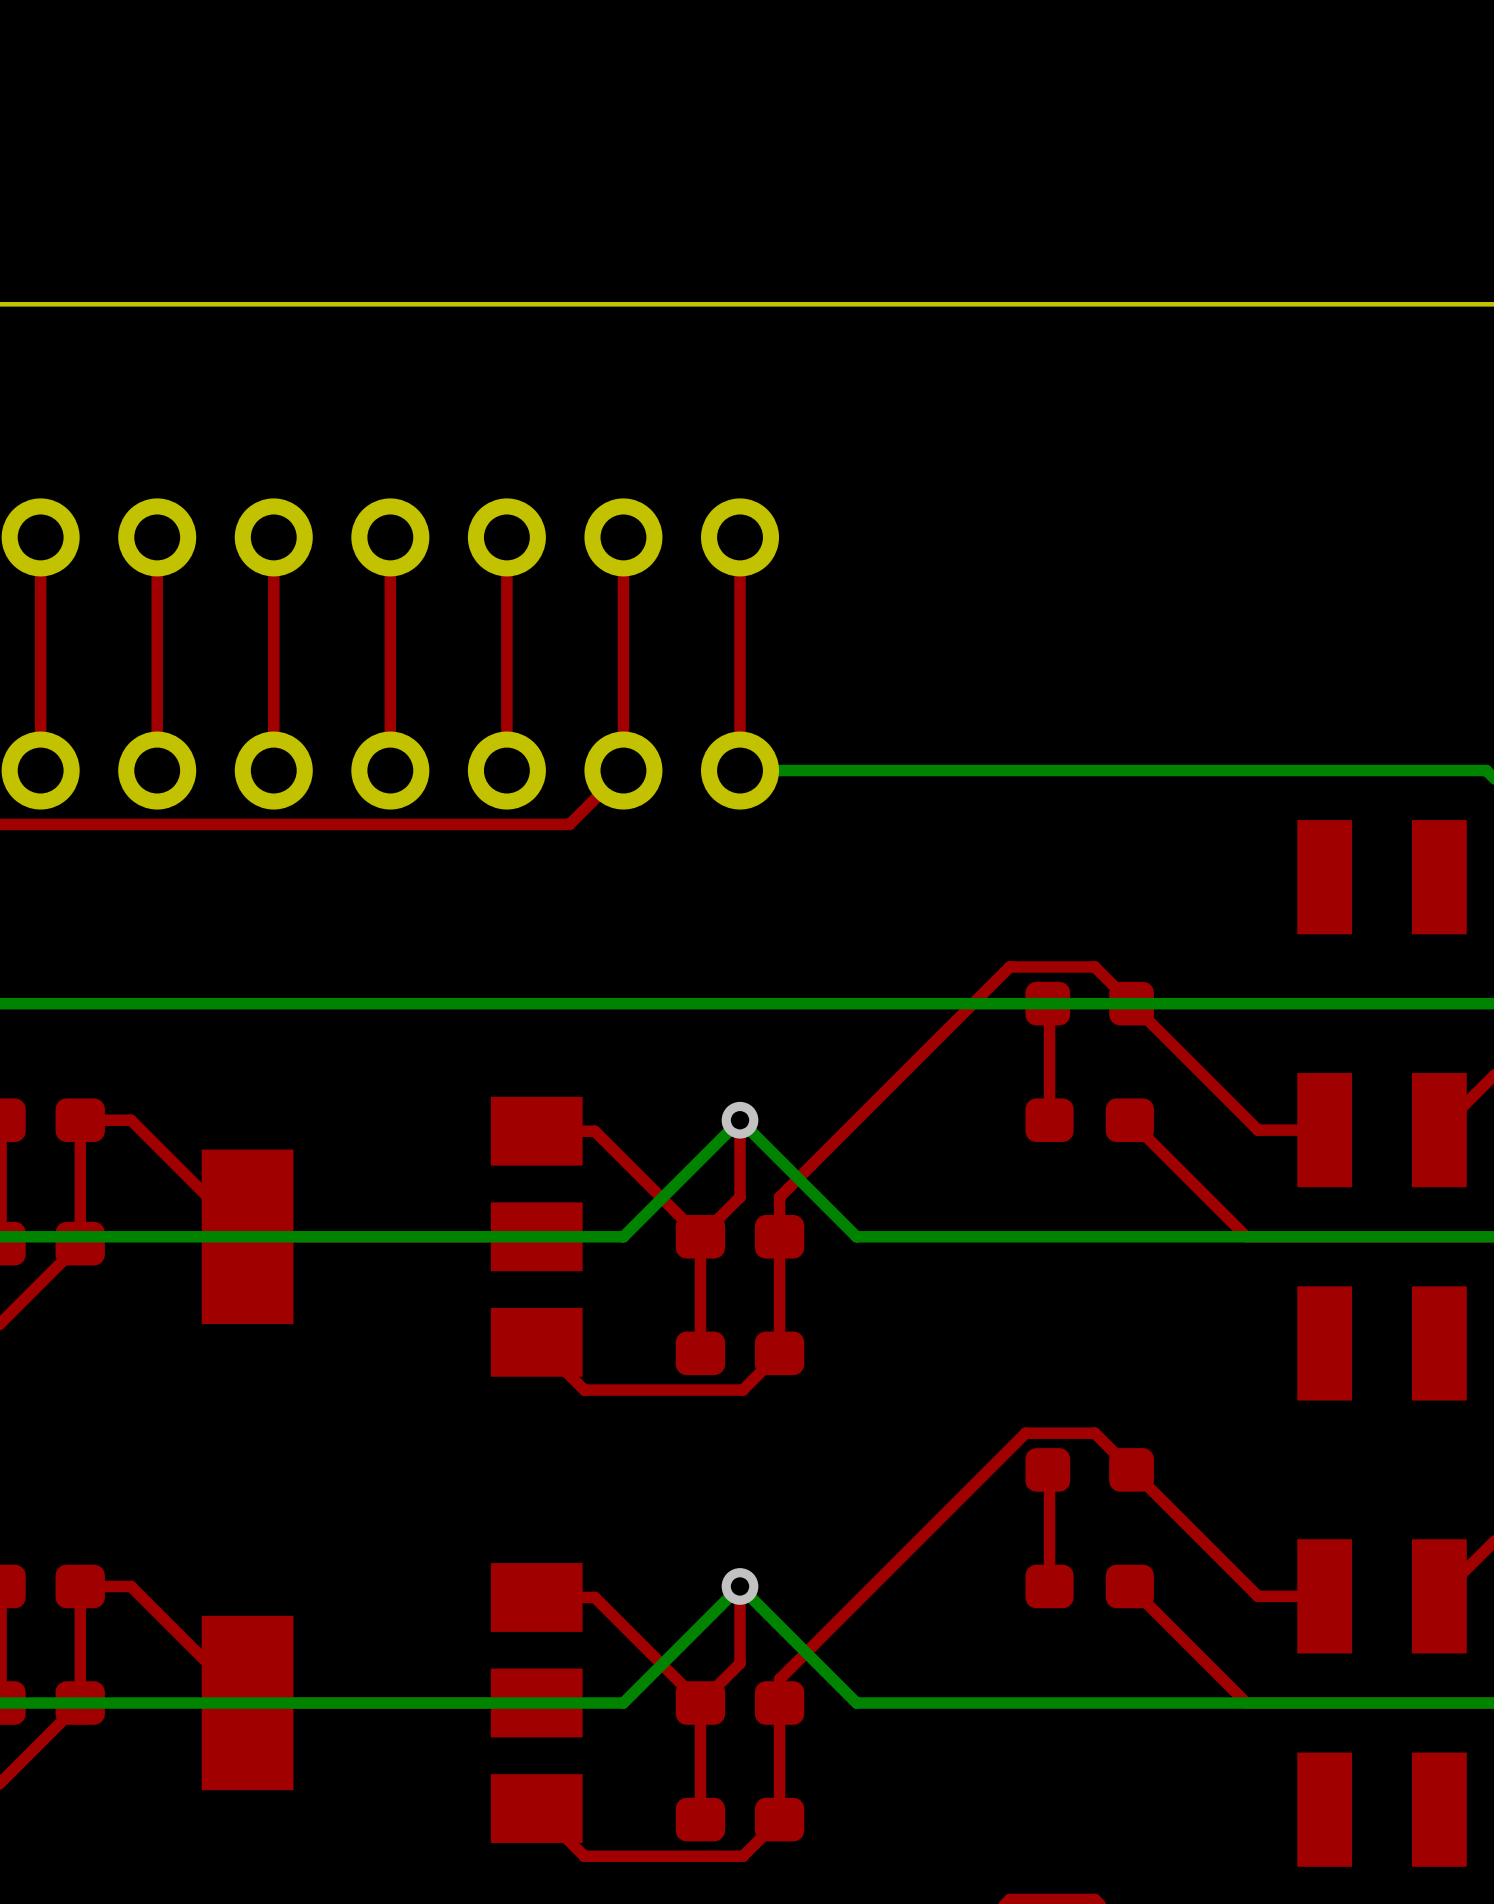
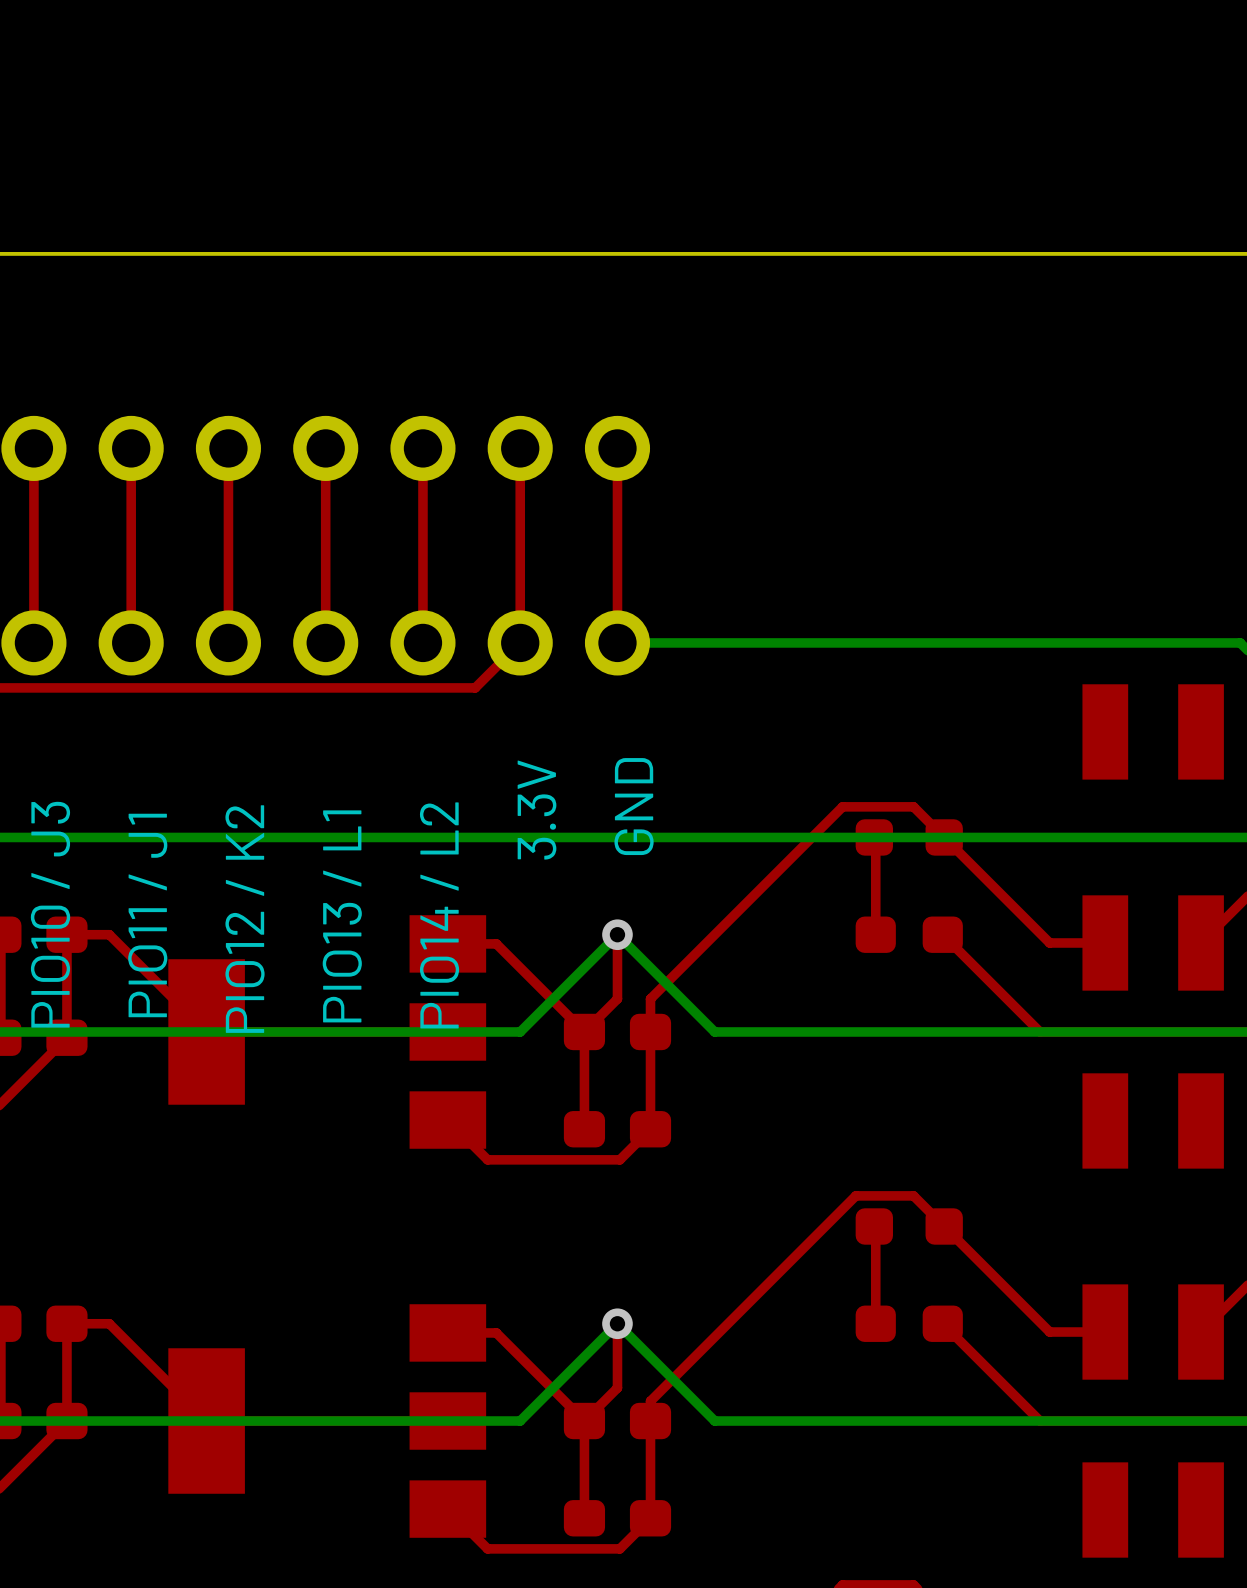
text: none -> GND (634, 806)
text: none -> 3.3V (537, 810)
text: none -> PIO10 / J3 (50, 914)
text: none -> PIO11 / J1 (147, 915)
text: none -> PIO13 / L1 (342, 916)
text: none -> PIO14 / L2 (439, 915)
text: none -> PIO12 / K2 (245, 919)

